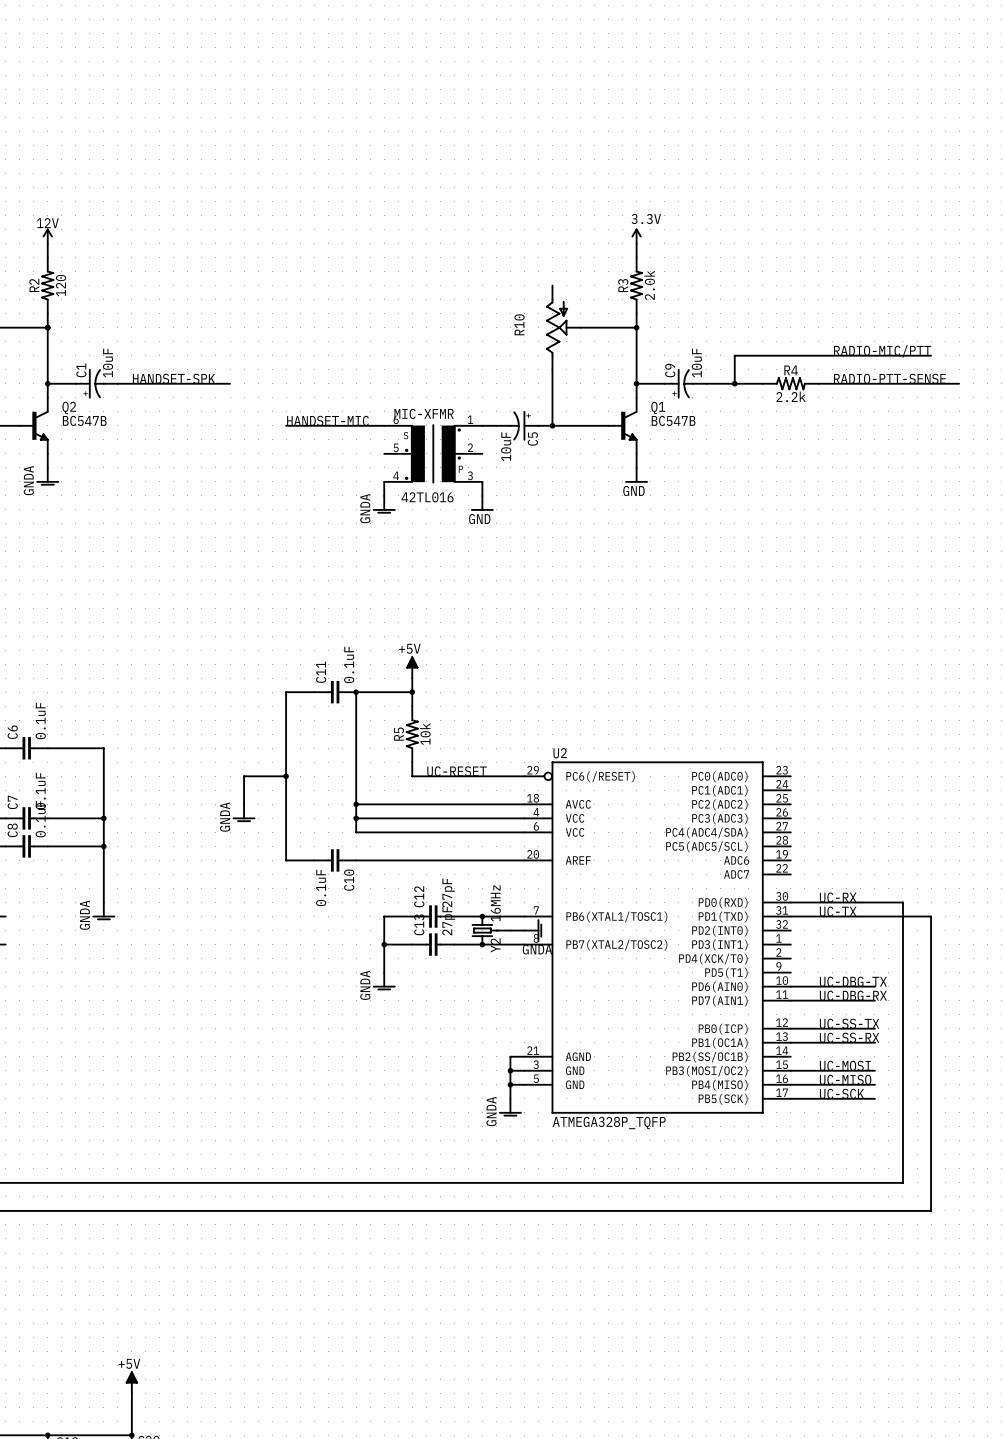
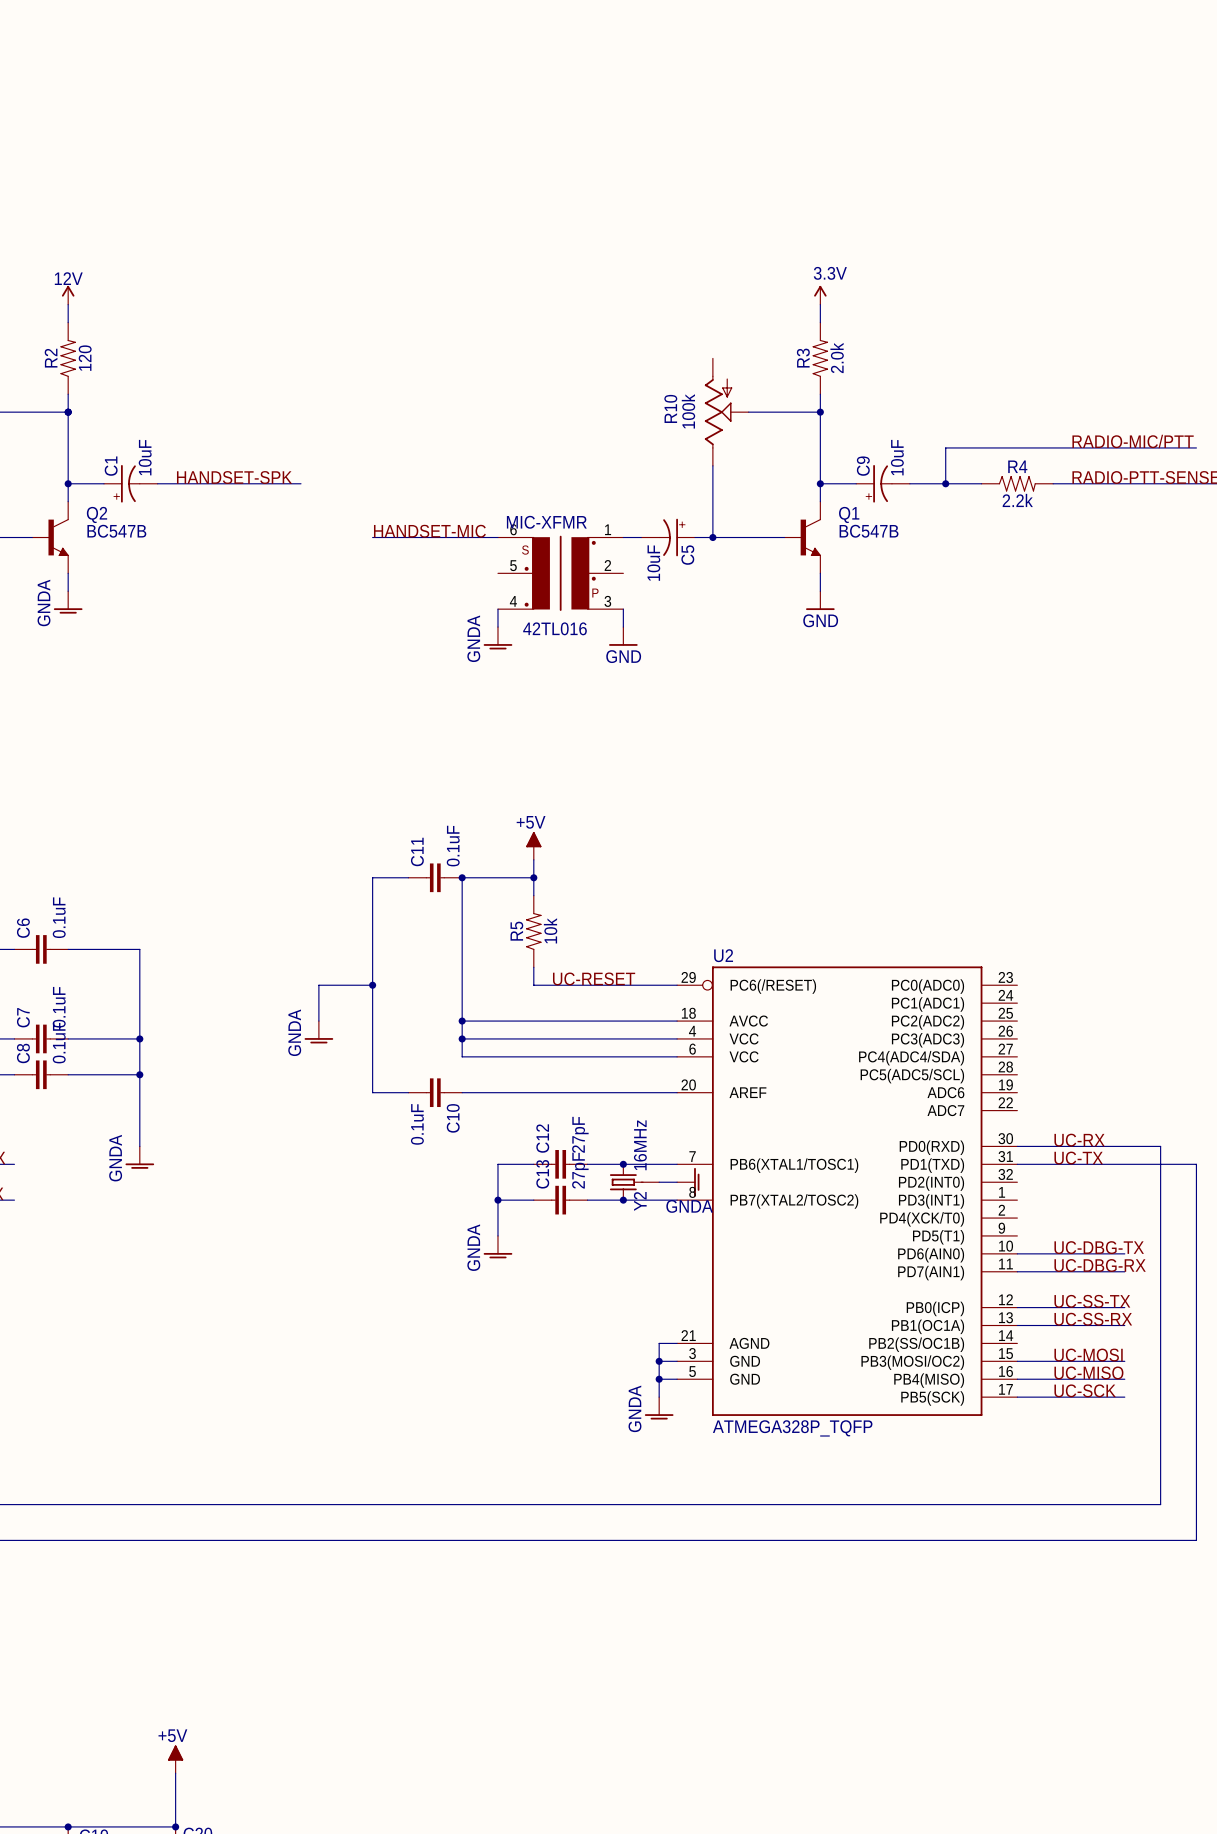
R10 value: none -> 100k (688, 411)

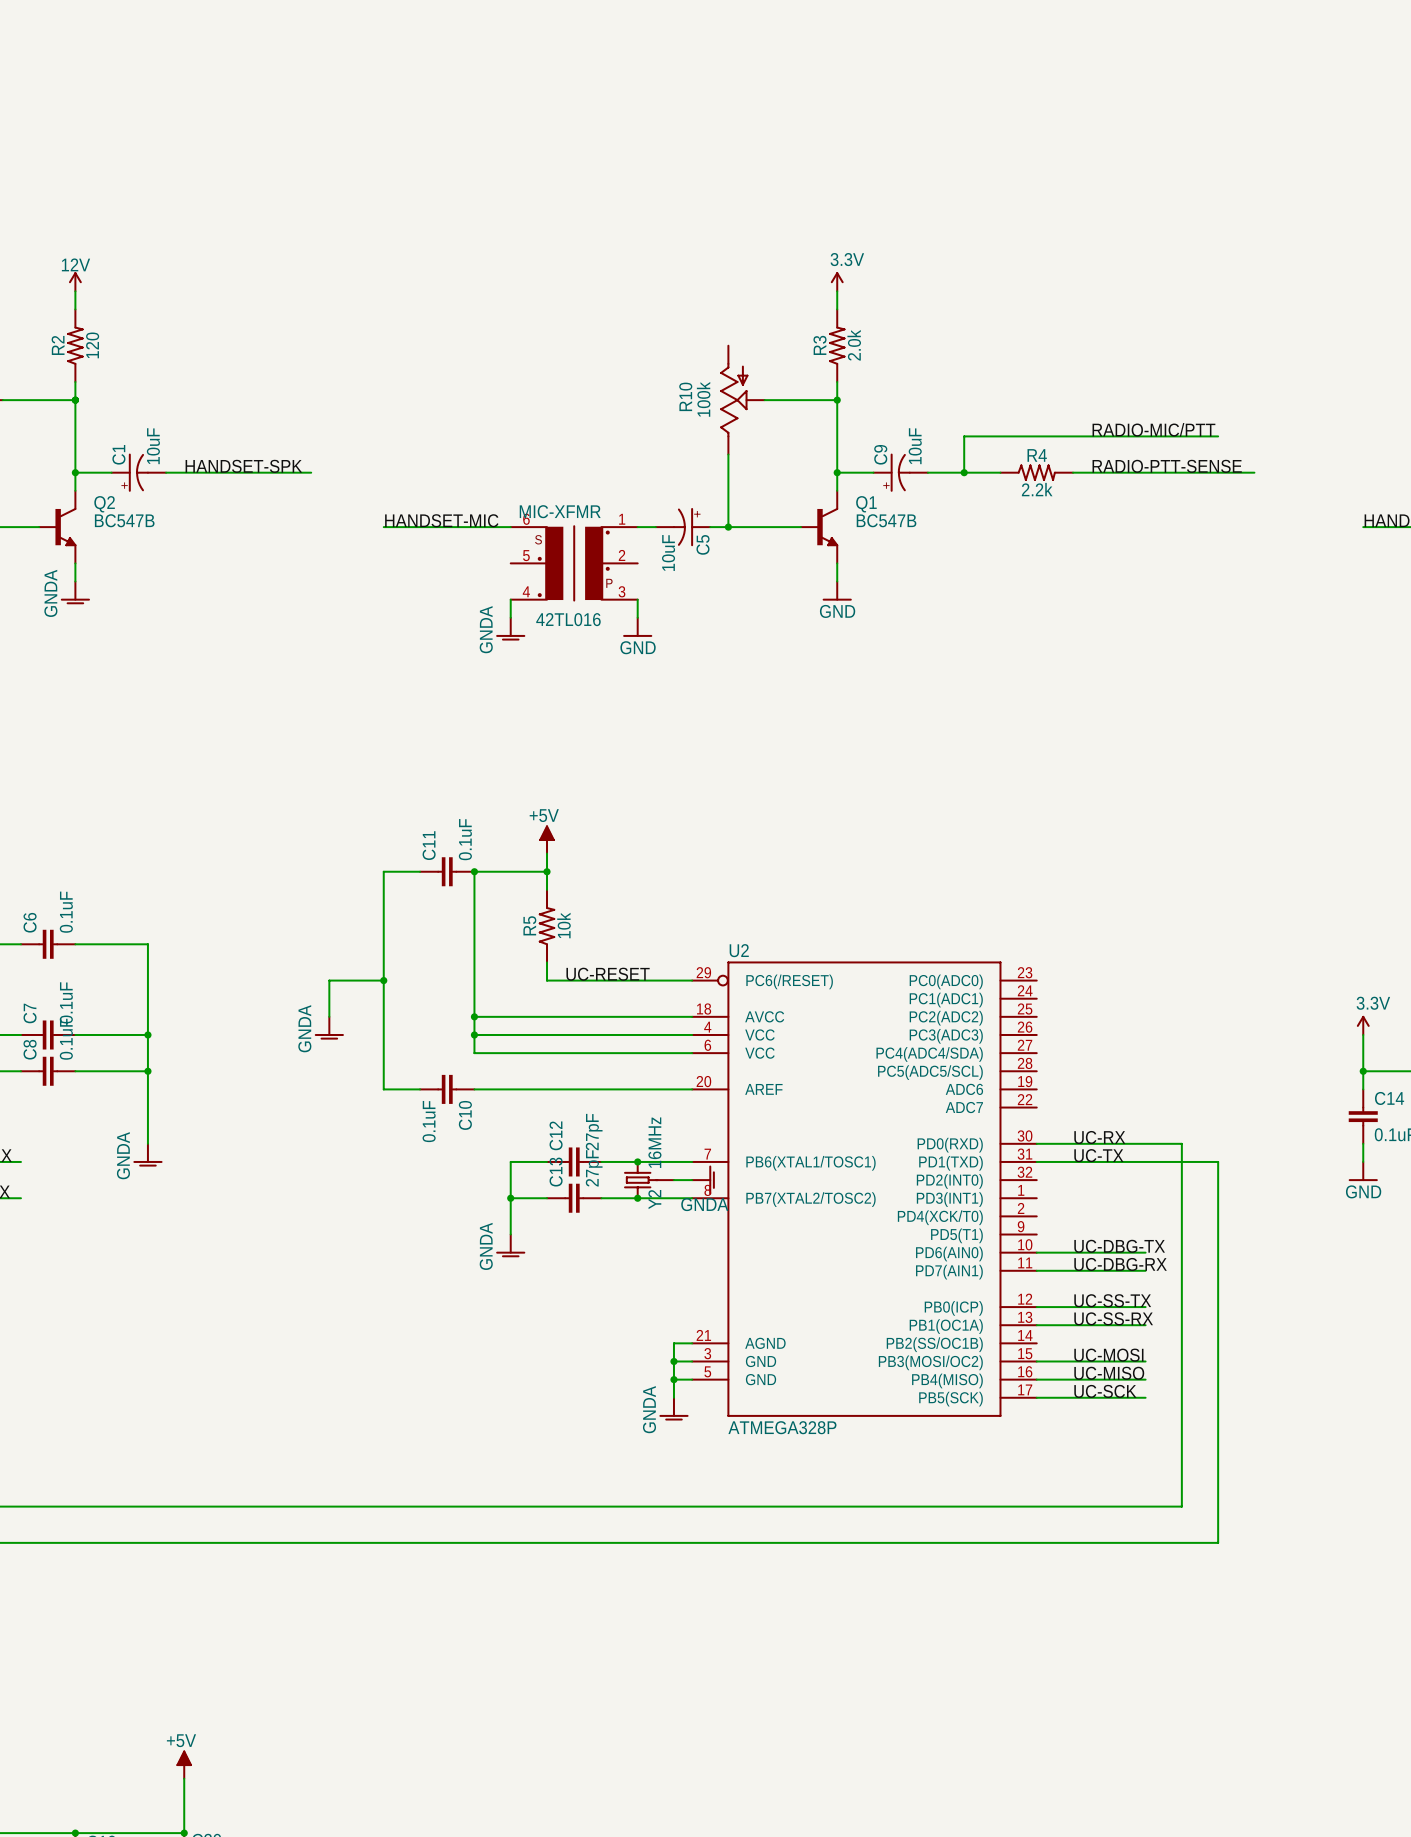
U2 value: ATMEGA328P_TQFP (792, 1428) -> ATMEGA328P (782, 1427)

